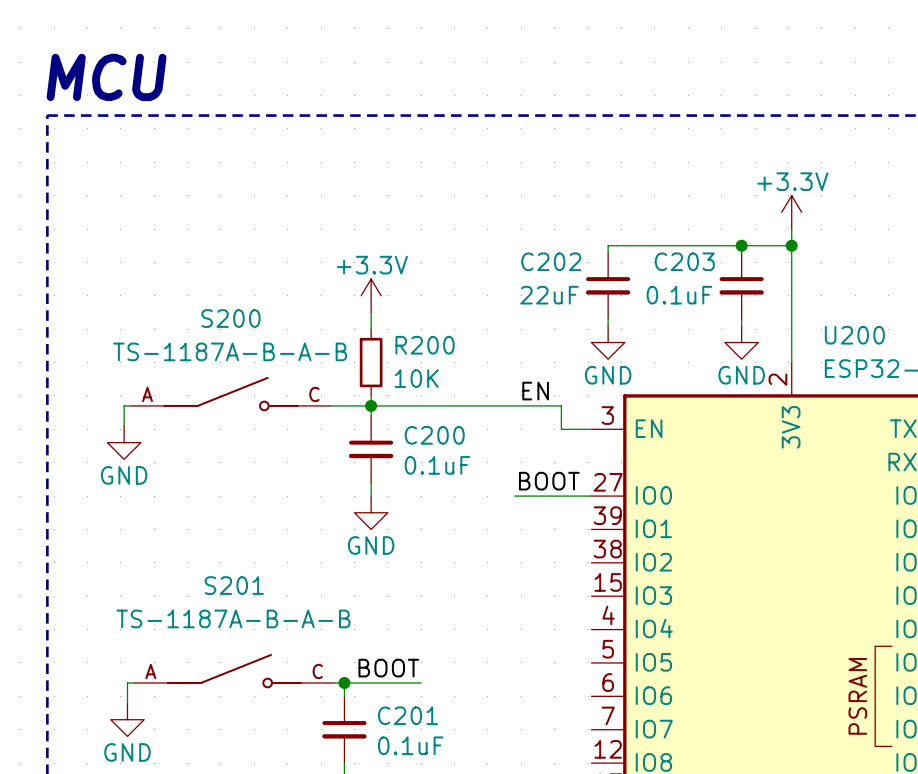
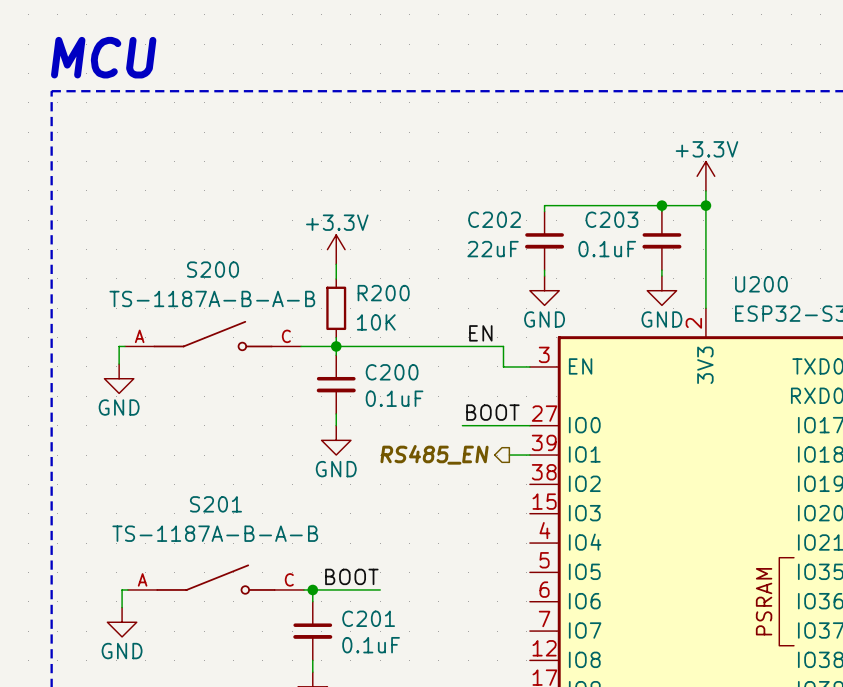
hierarchical label: none -> RS485_EN (434, 454)
wire: none -> (509, 455) (529, 455)

